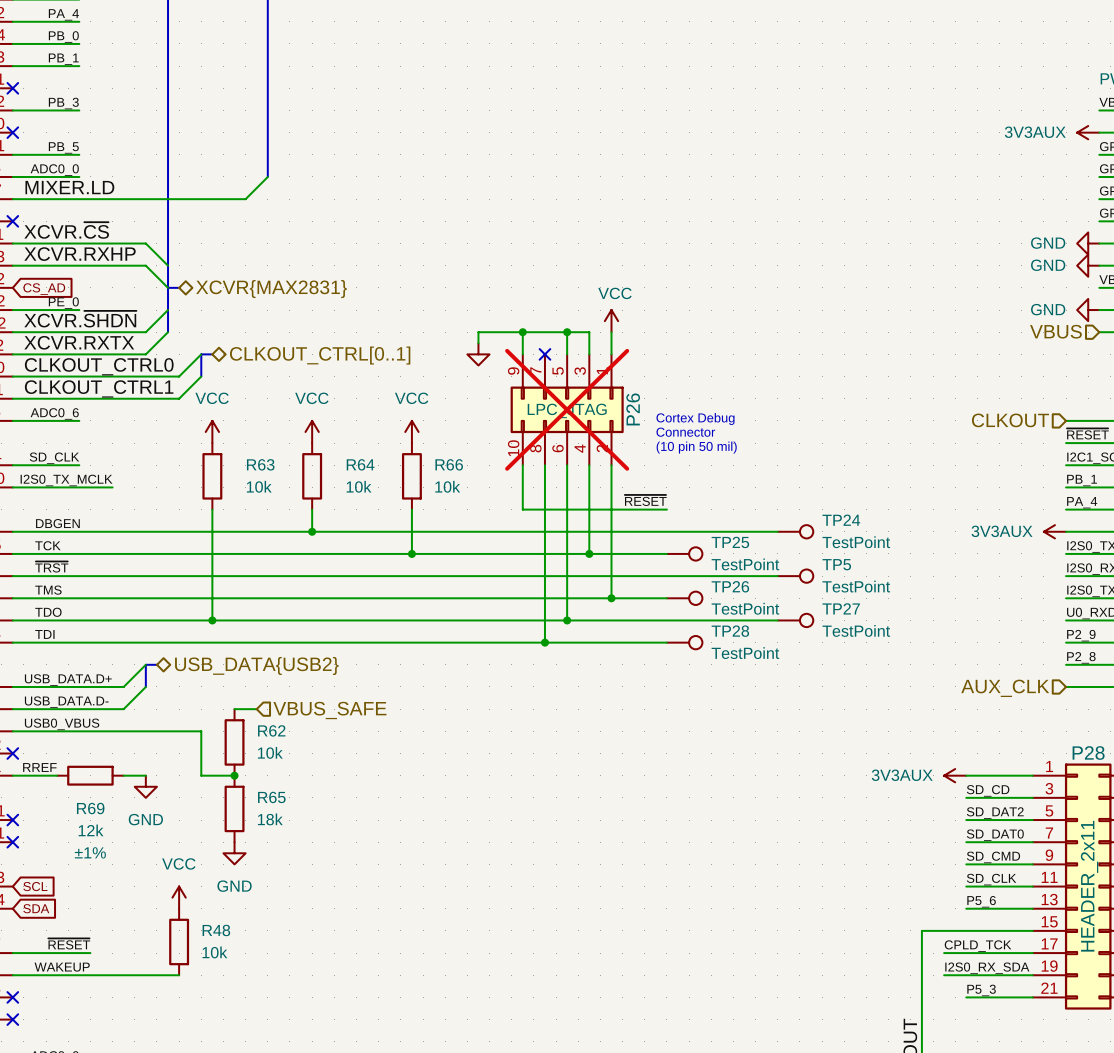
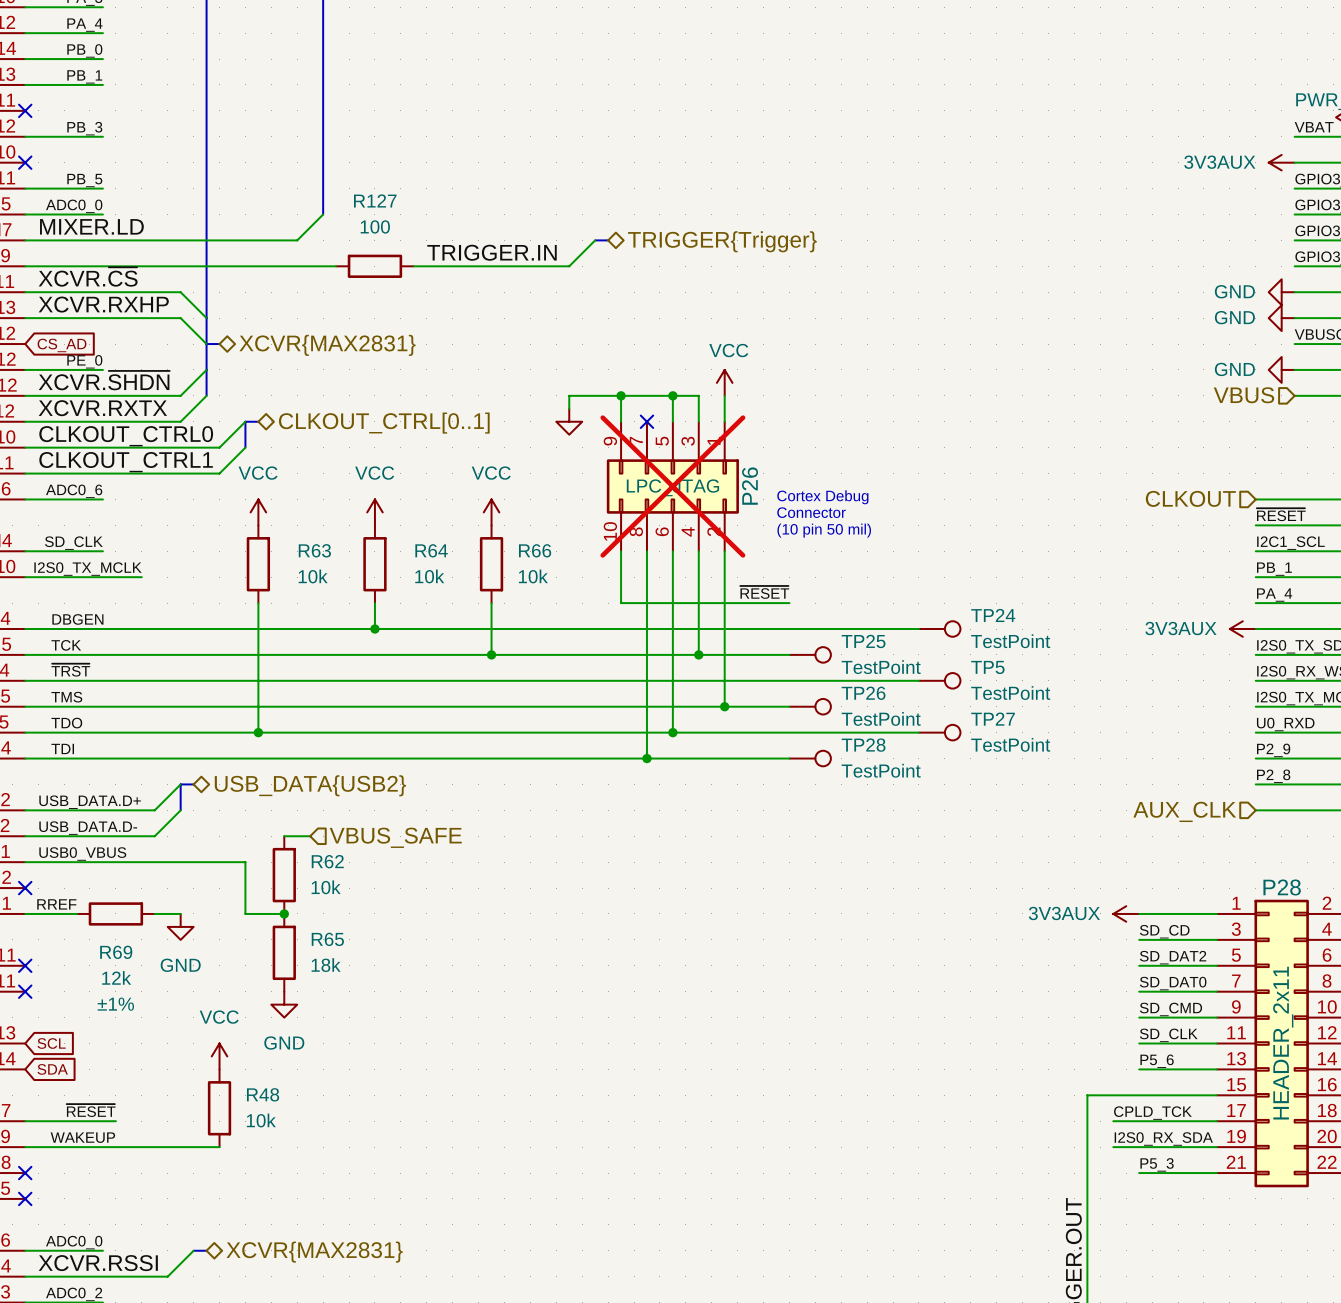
wire: none -> (595, 240) (569, 266) (413, 266)
bus: none -> (595, 240) (608, 240)
hierarchical label: none -> TRIGGER{Trigger} (722, 241)
label: none -> TRIGGER.IN (492, 252)
wire: none -> (25, 266) (336, 266)
no-connect mark: (12, 221) -> none
R127: none -> 100 (374, 266)

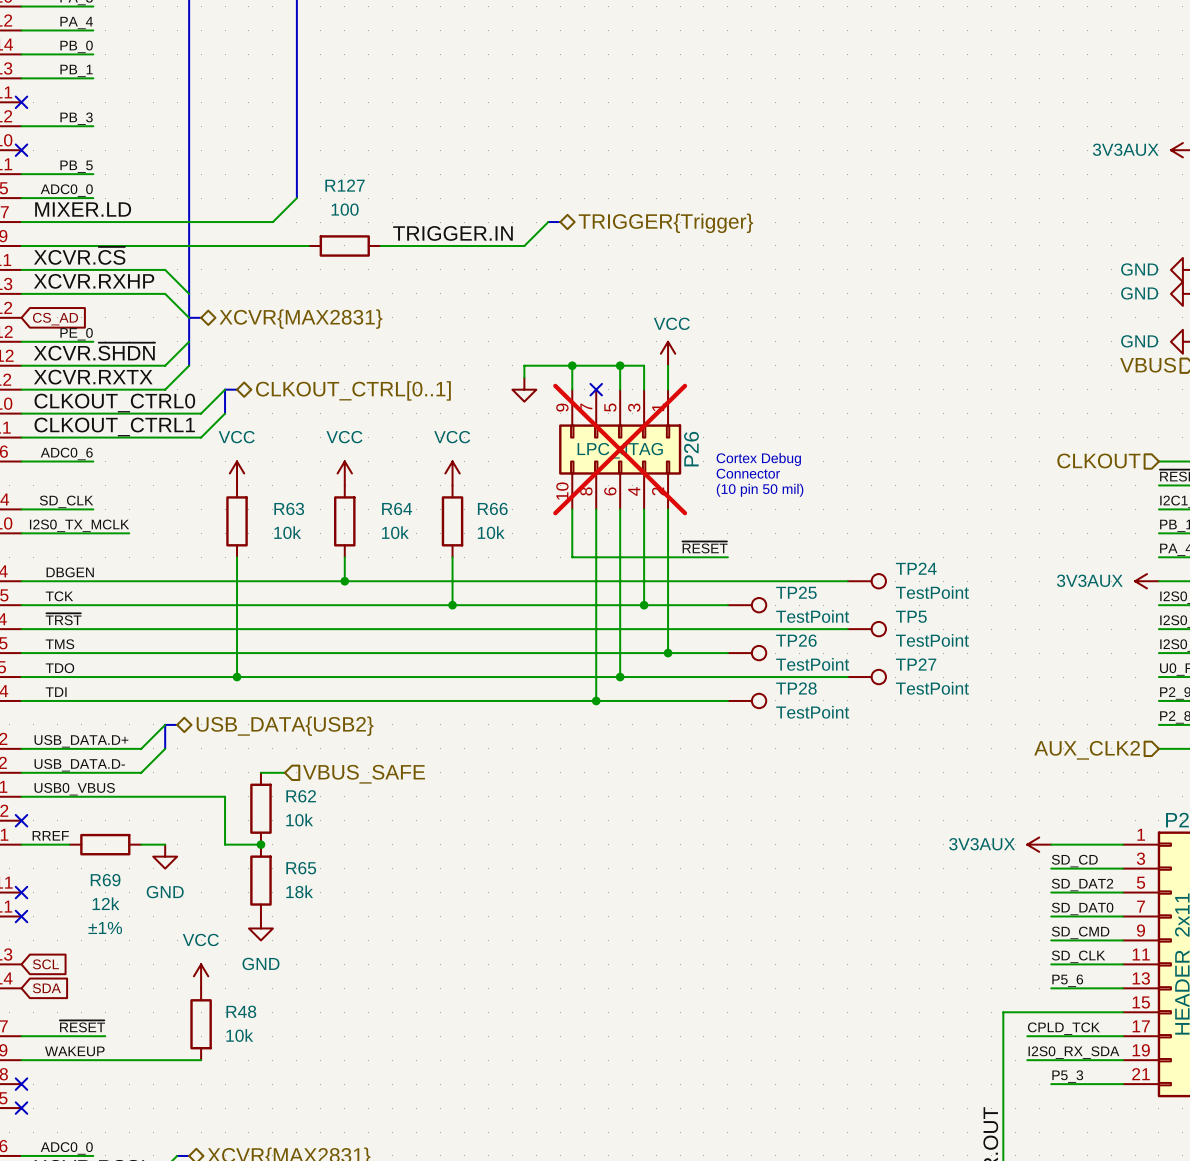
hierarchical label: AUX_CLK (1184, 811) -> AUX_CLK2 (1087, 750)

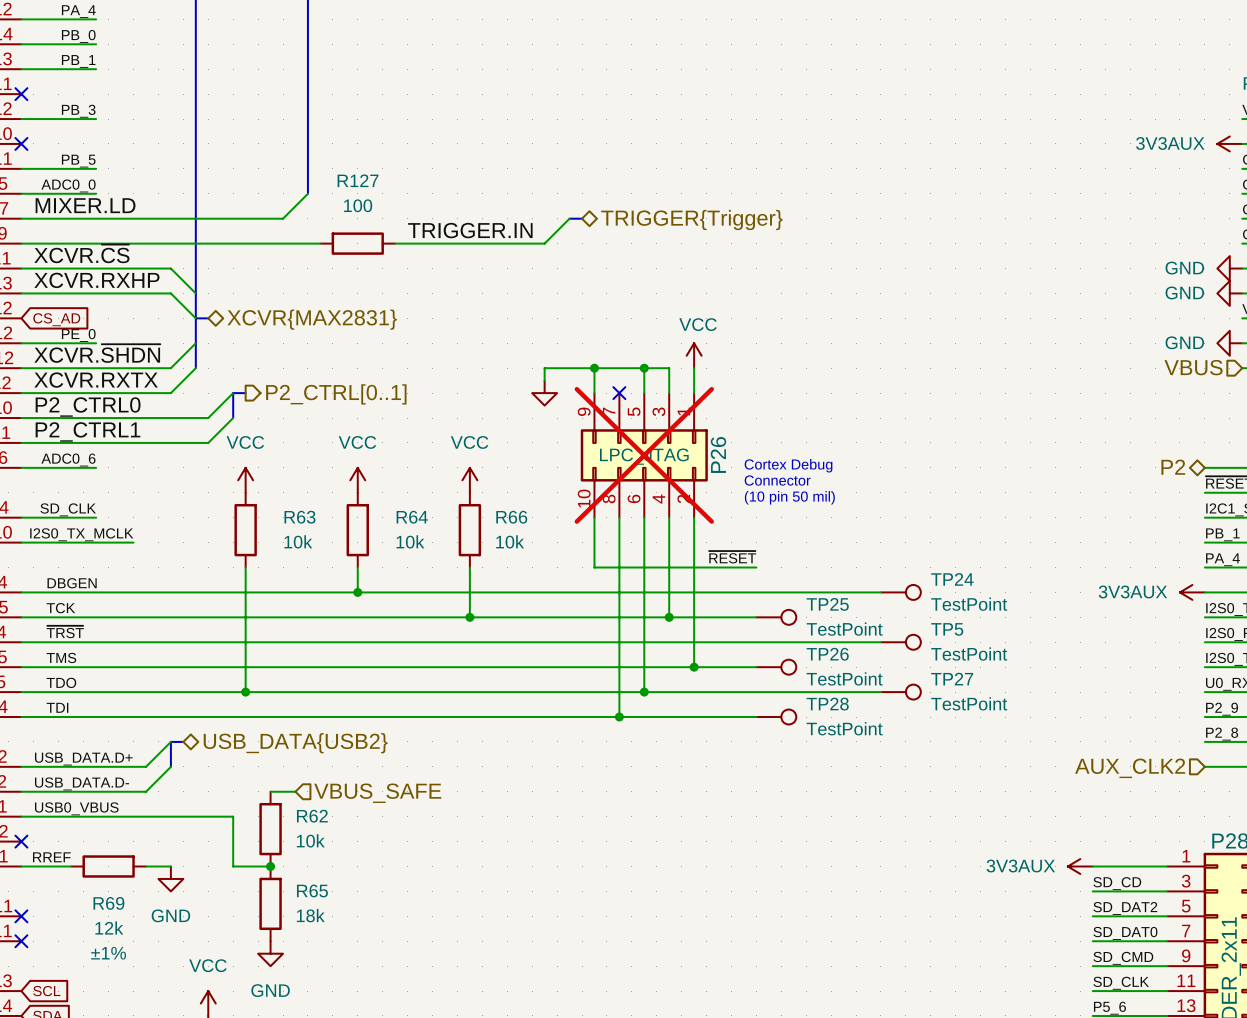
hierarchical label shape: bidirectional (353, 390) -> output (336, 394)
hierarchical label: CLKOUT_CTRL[0..1] (353, 390) -> P2_CTRL[0..1] (336, 394)
label: CLKOUT_CTRL0 (114, 403) -> P2_CTRL0 (88, 407)
label: CLKOUT_CTRL1 (114, 426) -> P2_CTRL1 (87, 431)
hierarchical label shape: input (1098, 460) -> bidirectional (1173, 467)
hierarchical label: CLKOUT (1098, 460) -> P2 (1173, 467)

